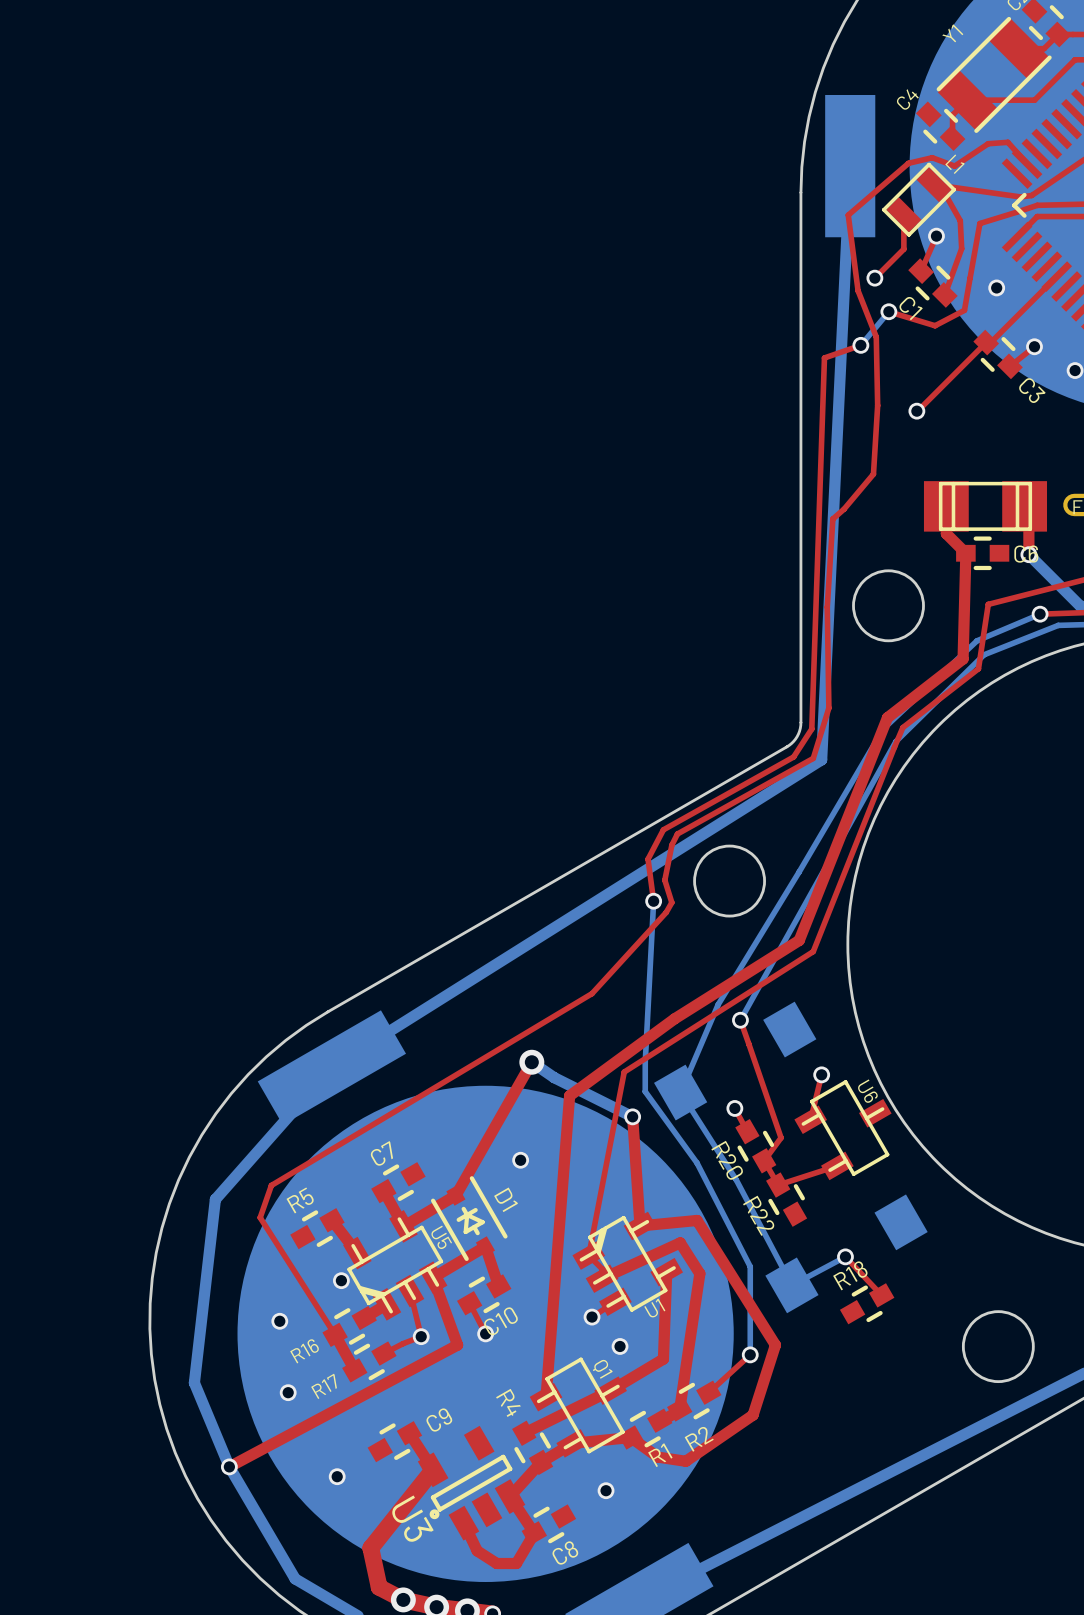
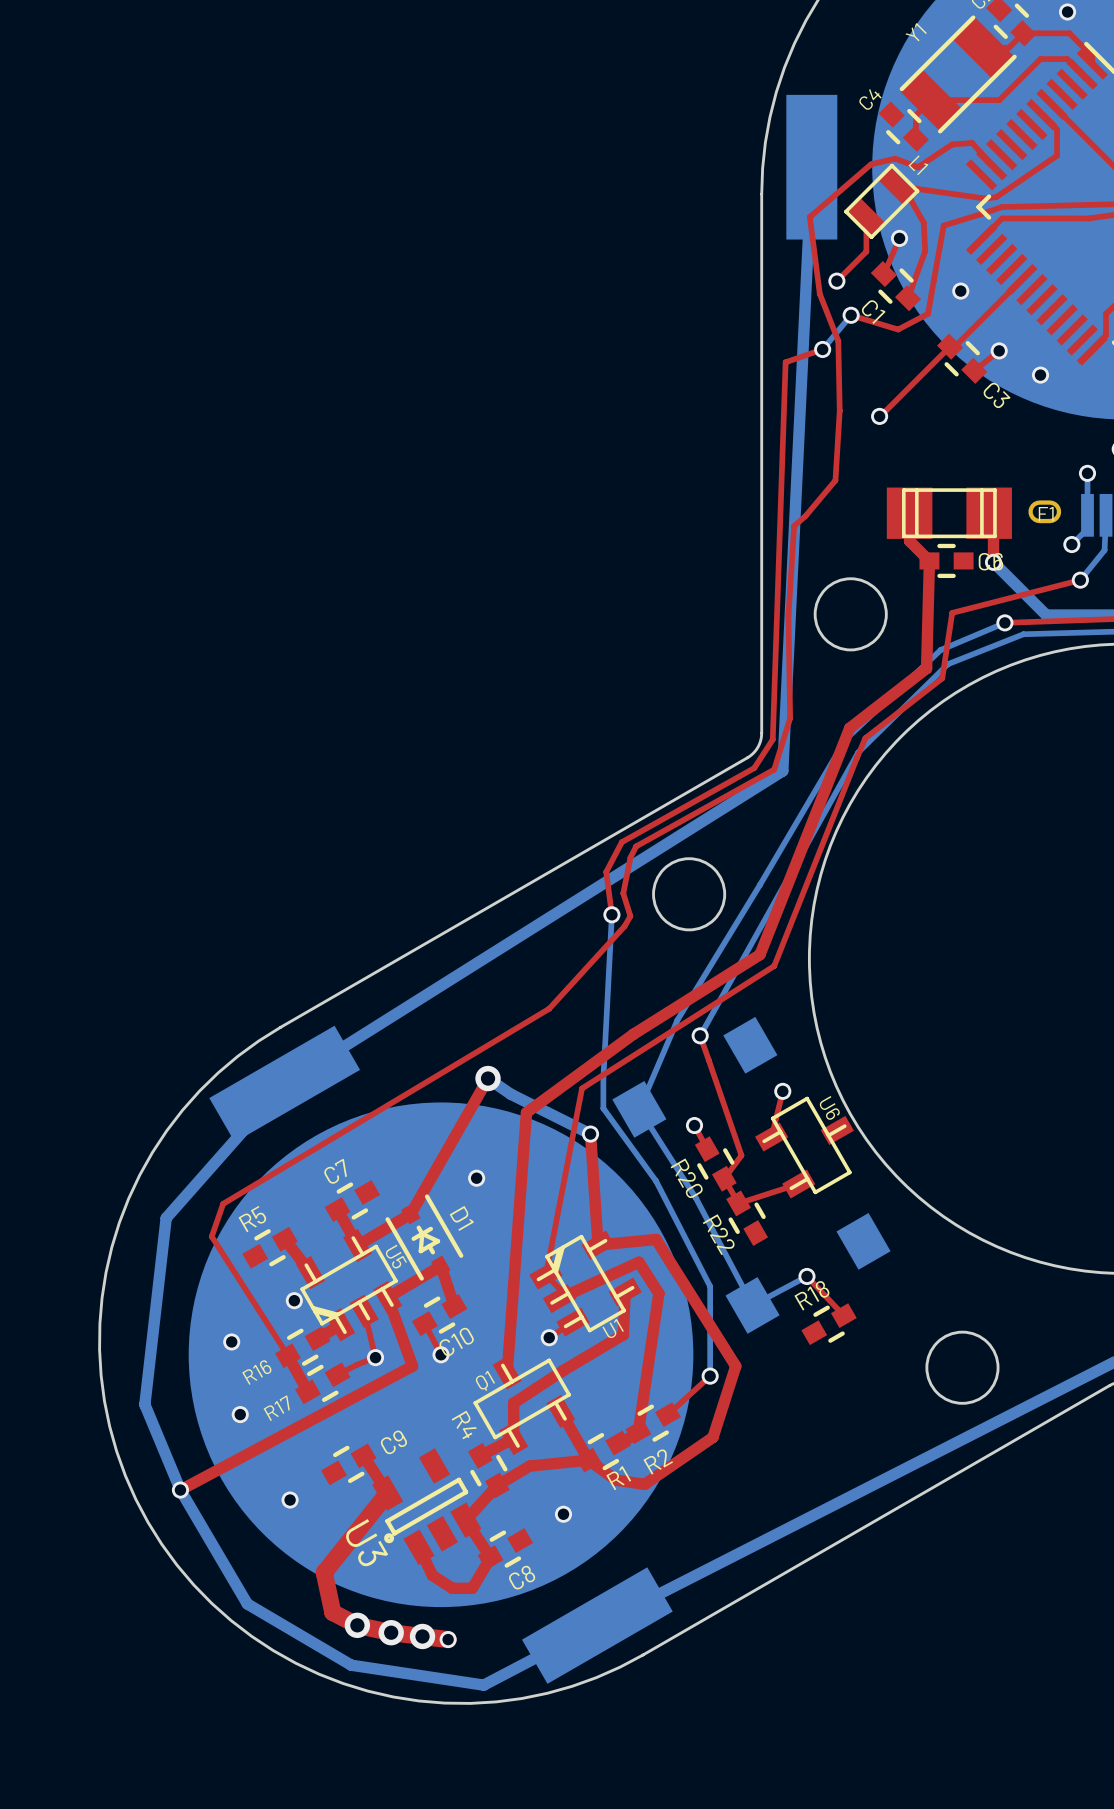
top track: (569, 1095) (546, 1397) -> (526, 1112) (507, 1372)
top track: (666, 1272) (663, 1359) (610, 1390) (524, 1433) -> (625, 1292) (623, 1334) (513, 1403) (513, 1438) (480, 1455)
via: (620, 1346) -> none
top track: none -> (560, 1411) (588, 1460)
Q1 rotation: 0° (578, 1407) -> 90° counterclockwise (524, 1405)

